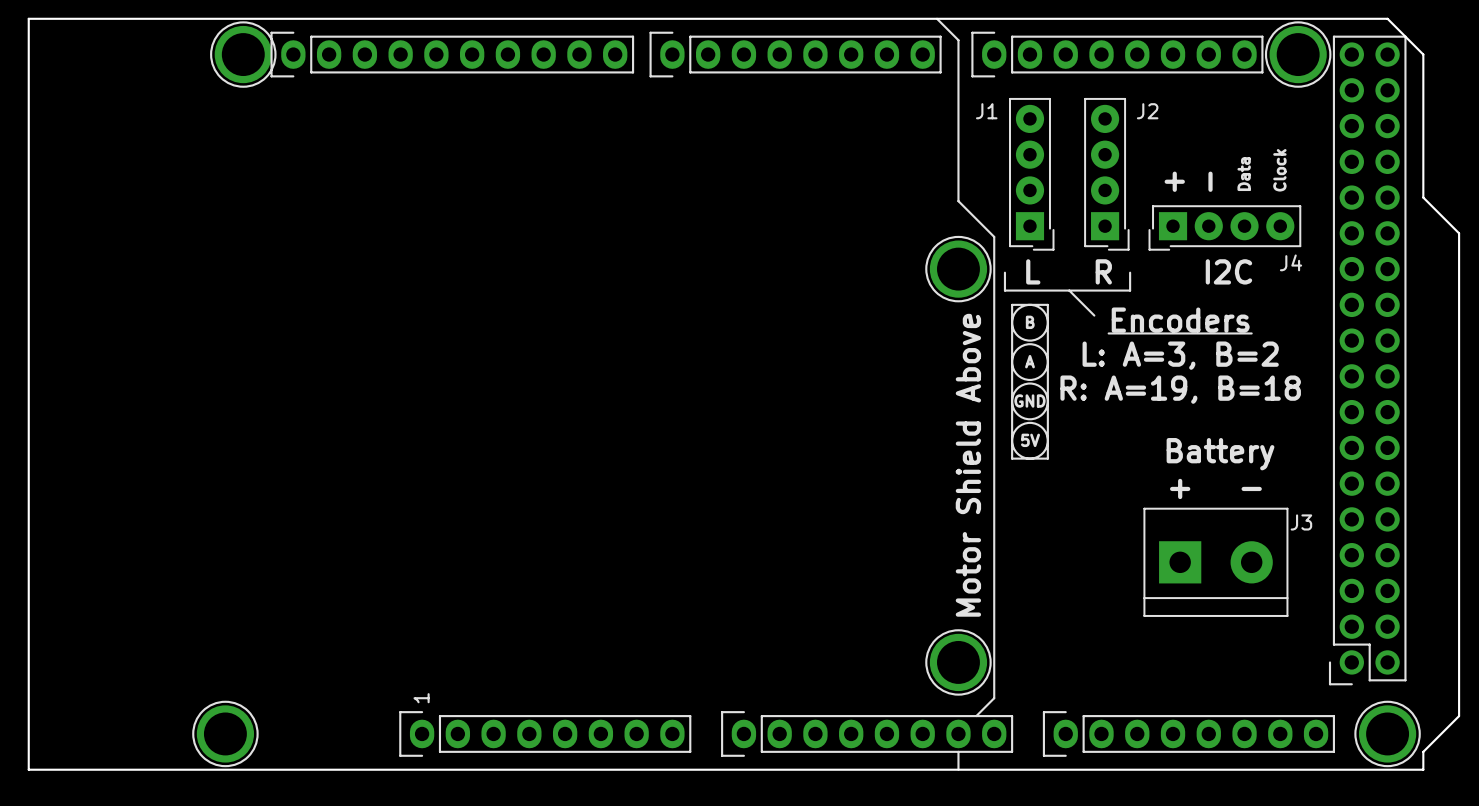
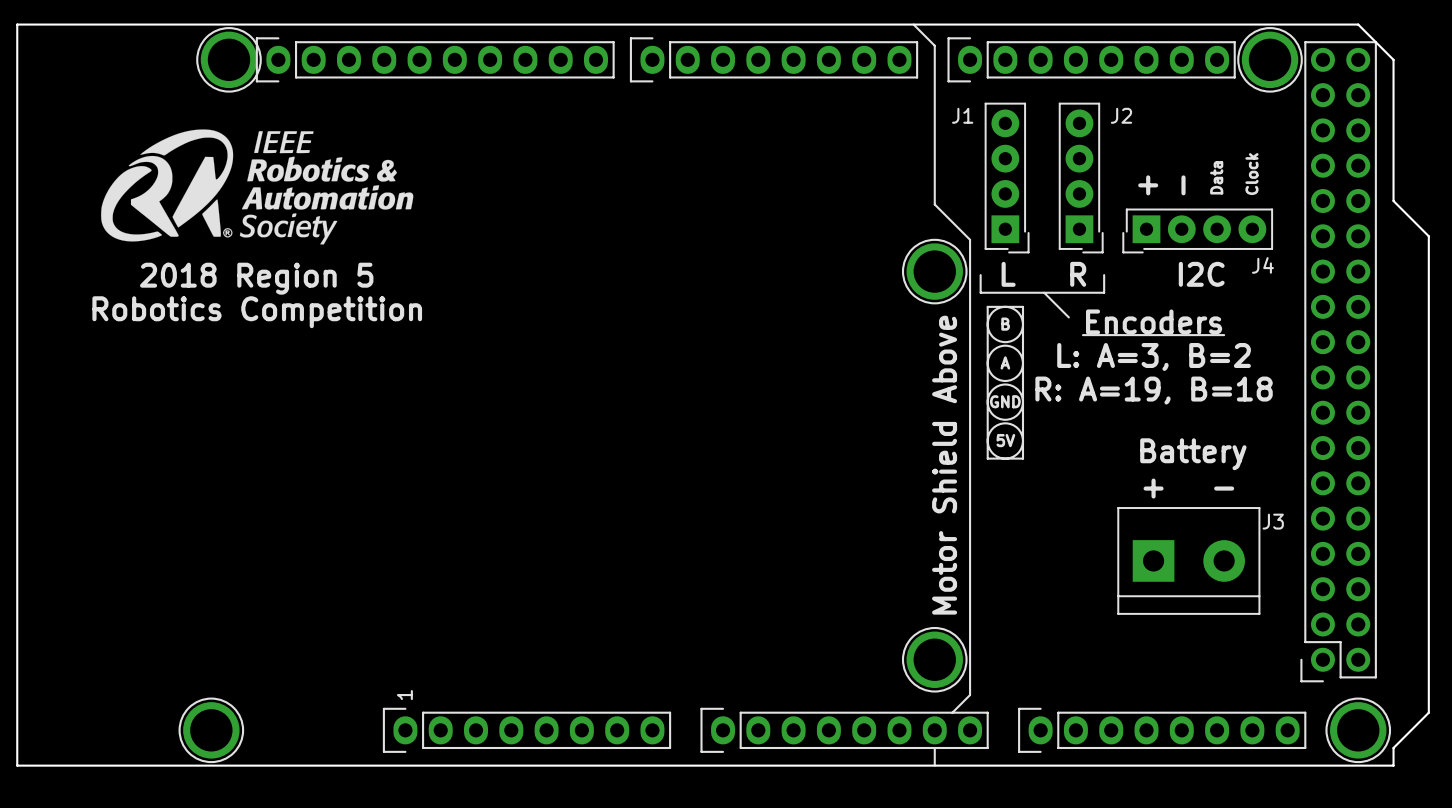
drawing: none -> [101, 129, 414, 245]
text: none -> 2018 Region 5 (256, 278)
text: none -> Robotics Competition (257, 312)

